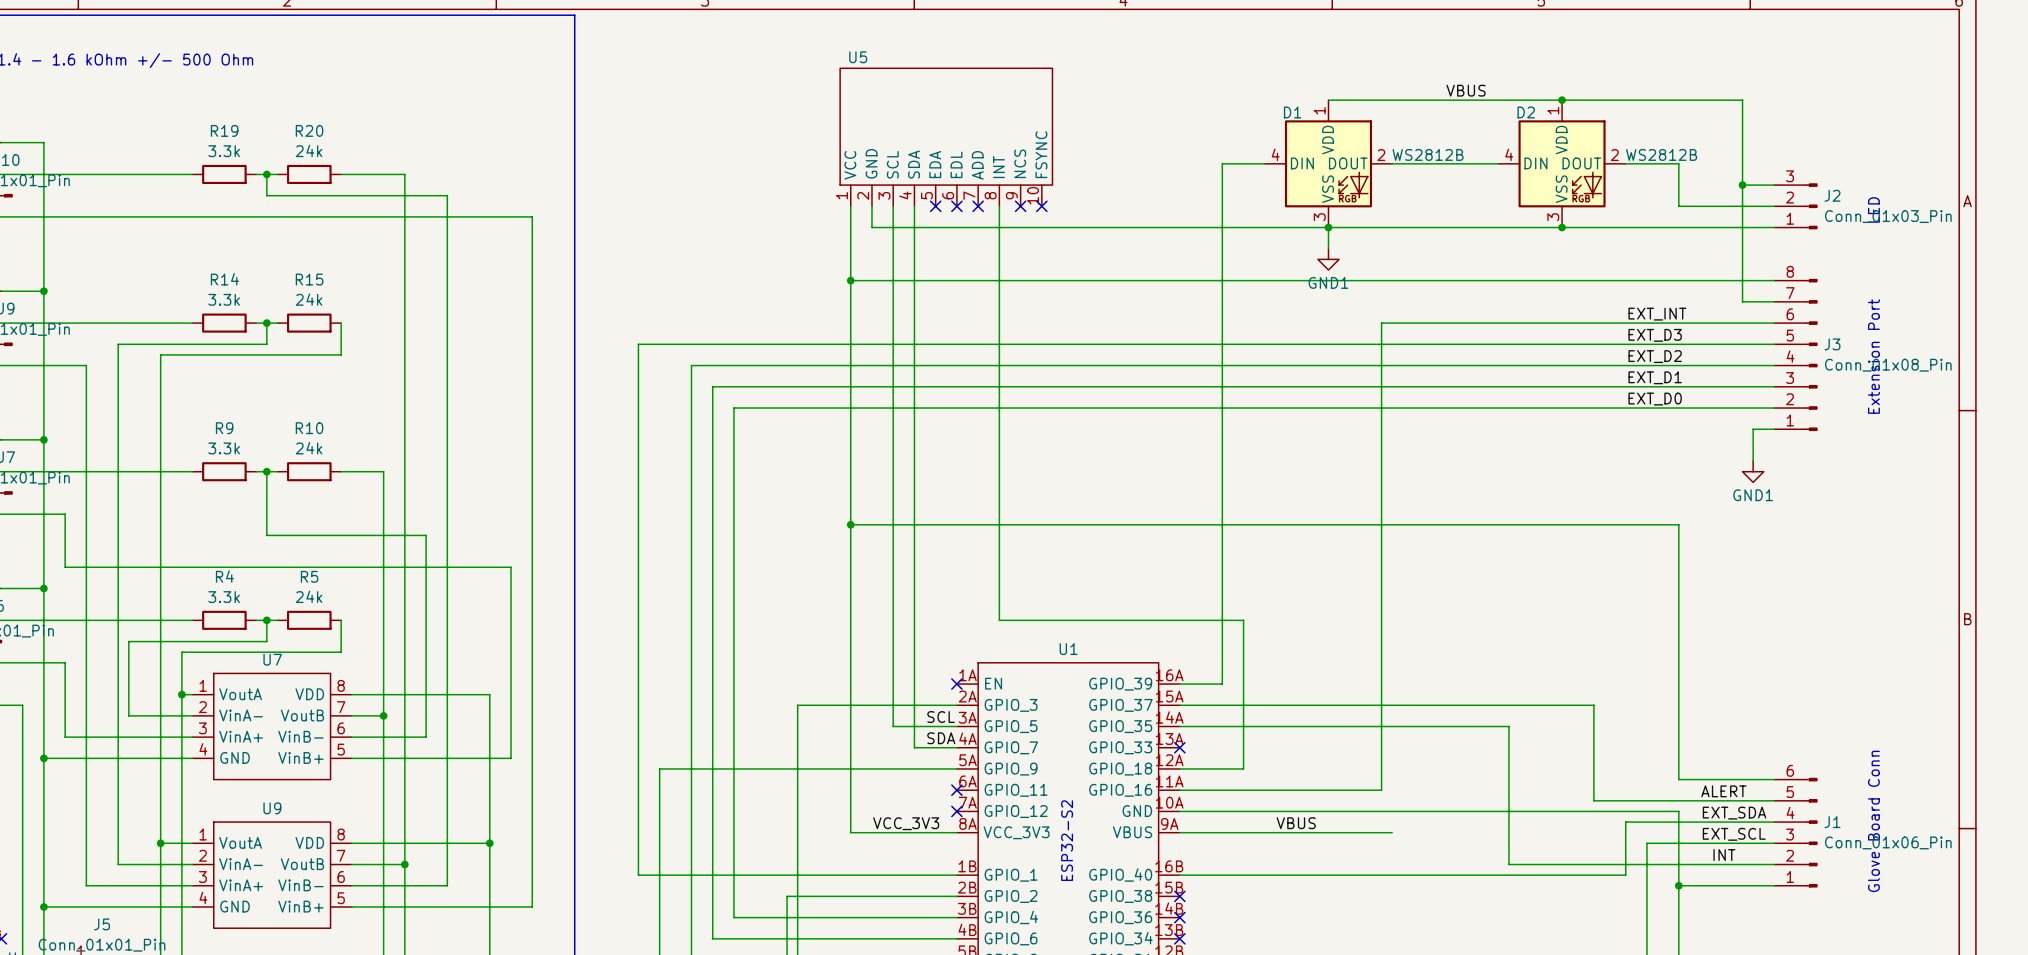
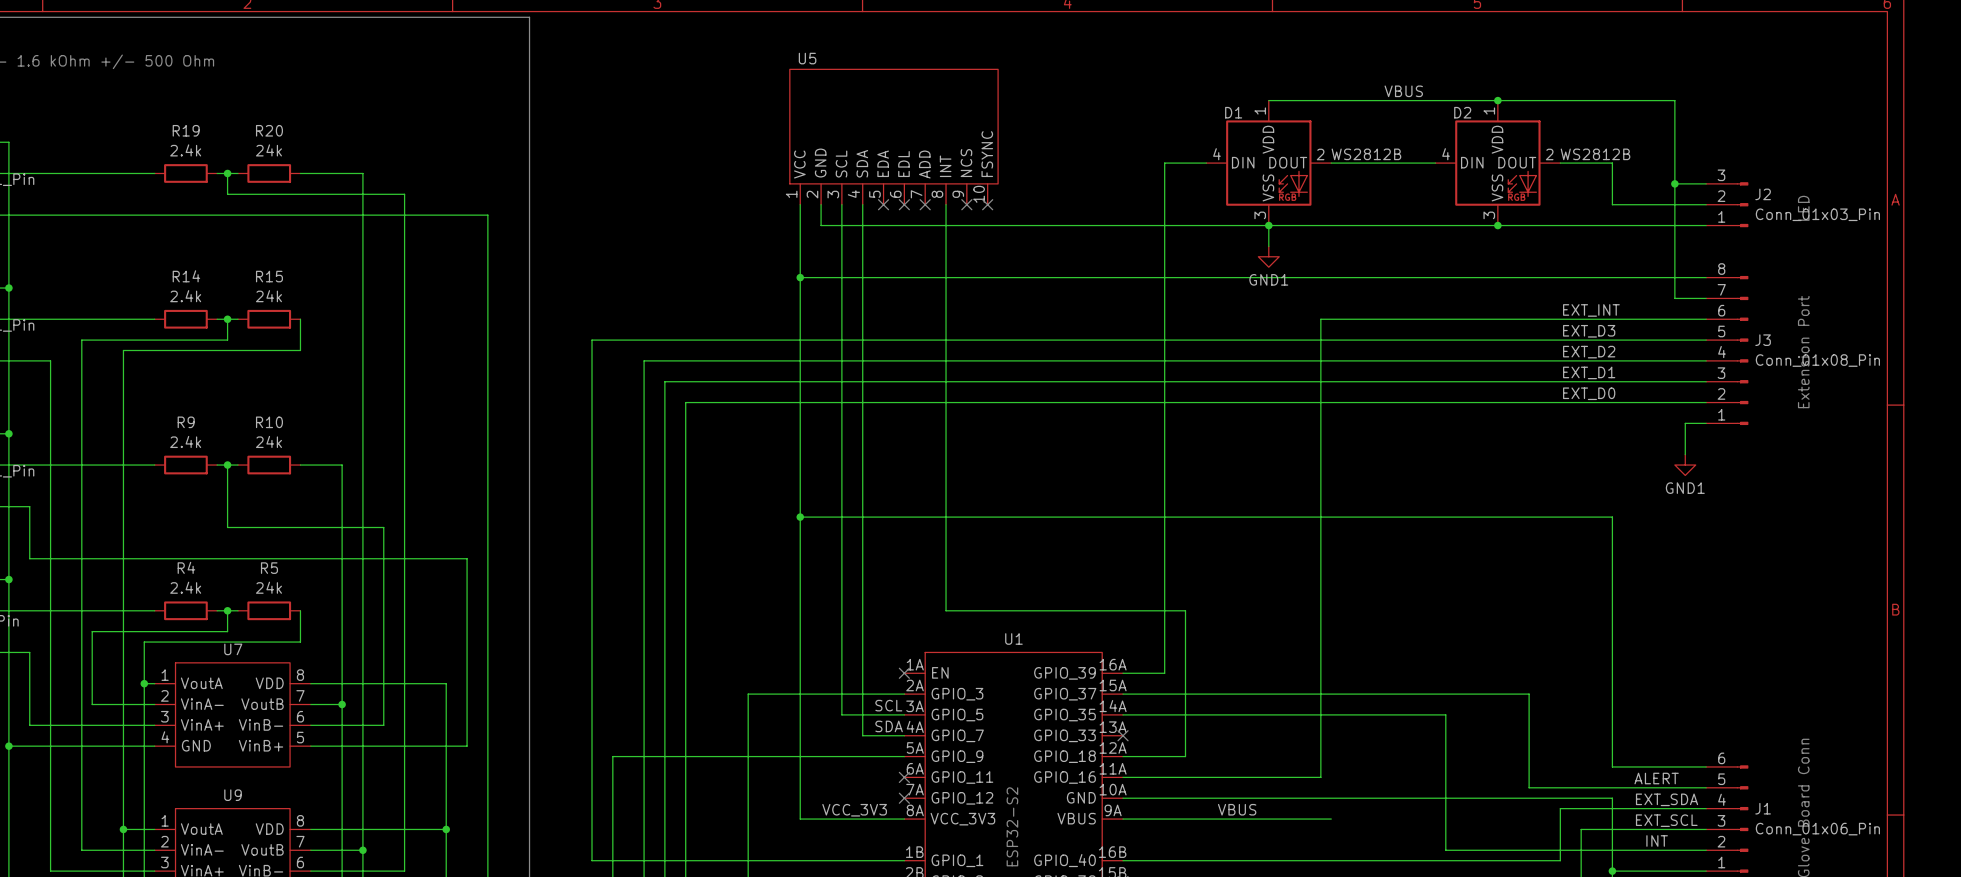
R19 value: 3.3k (224, 151) -> 2.4k (185, 150)
R14 value: 3.3k (224, 299) -> 2.4k (185, 296)
R9 value: 3.3k (224, 448) -> 2.4k (185, 441)
R4 value: 3.3k (224, 597) -> 2.4k (185, 587)

